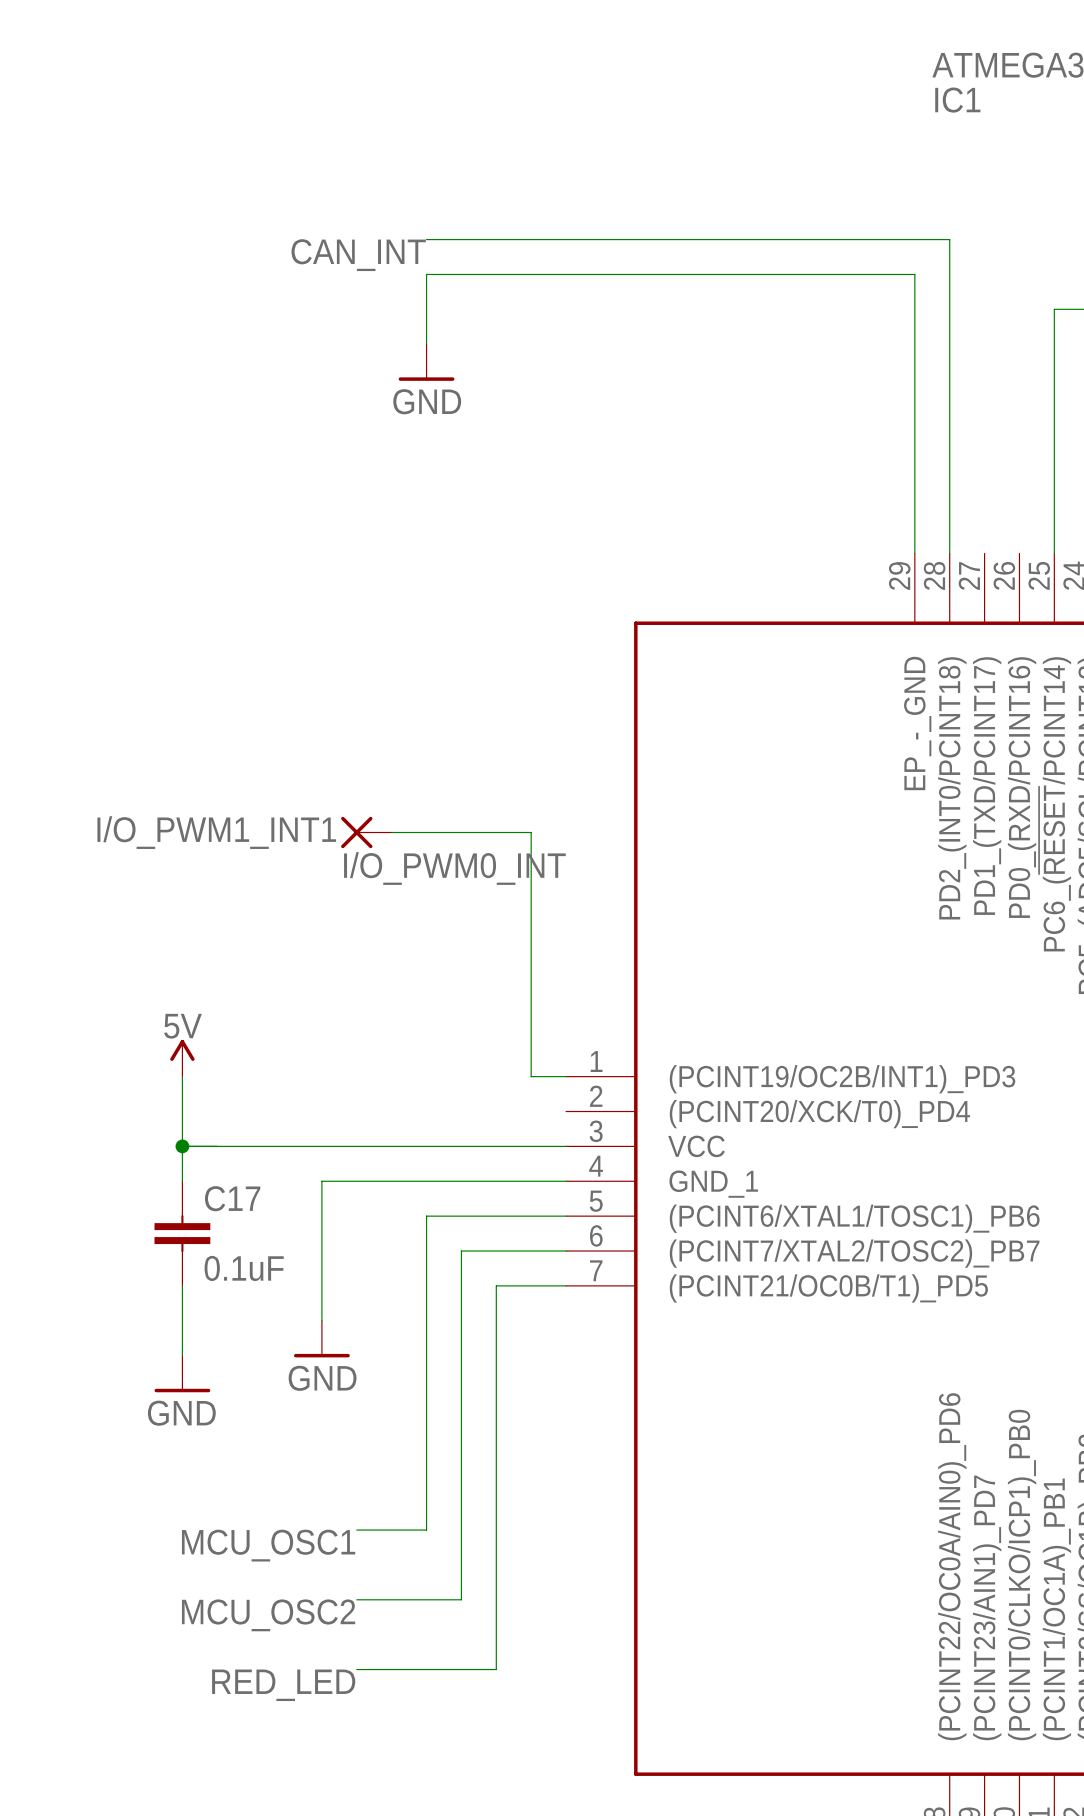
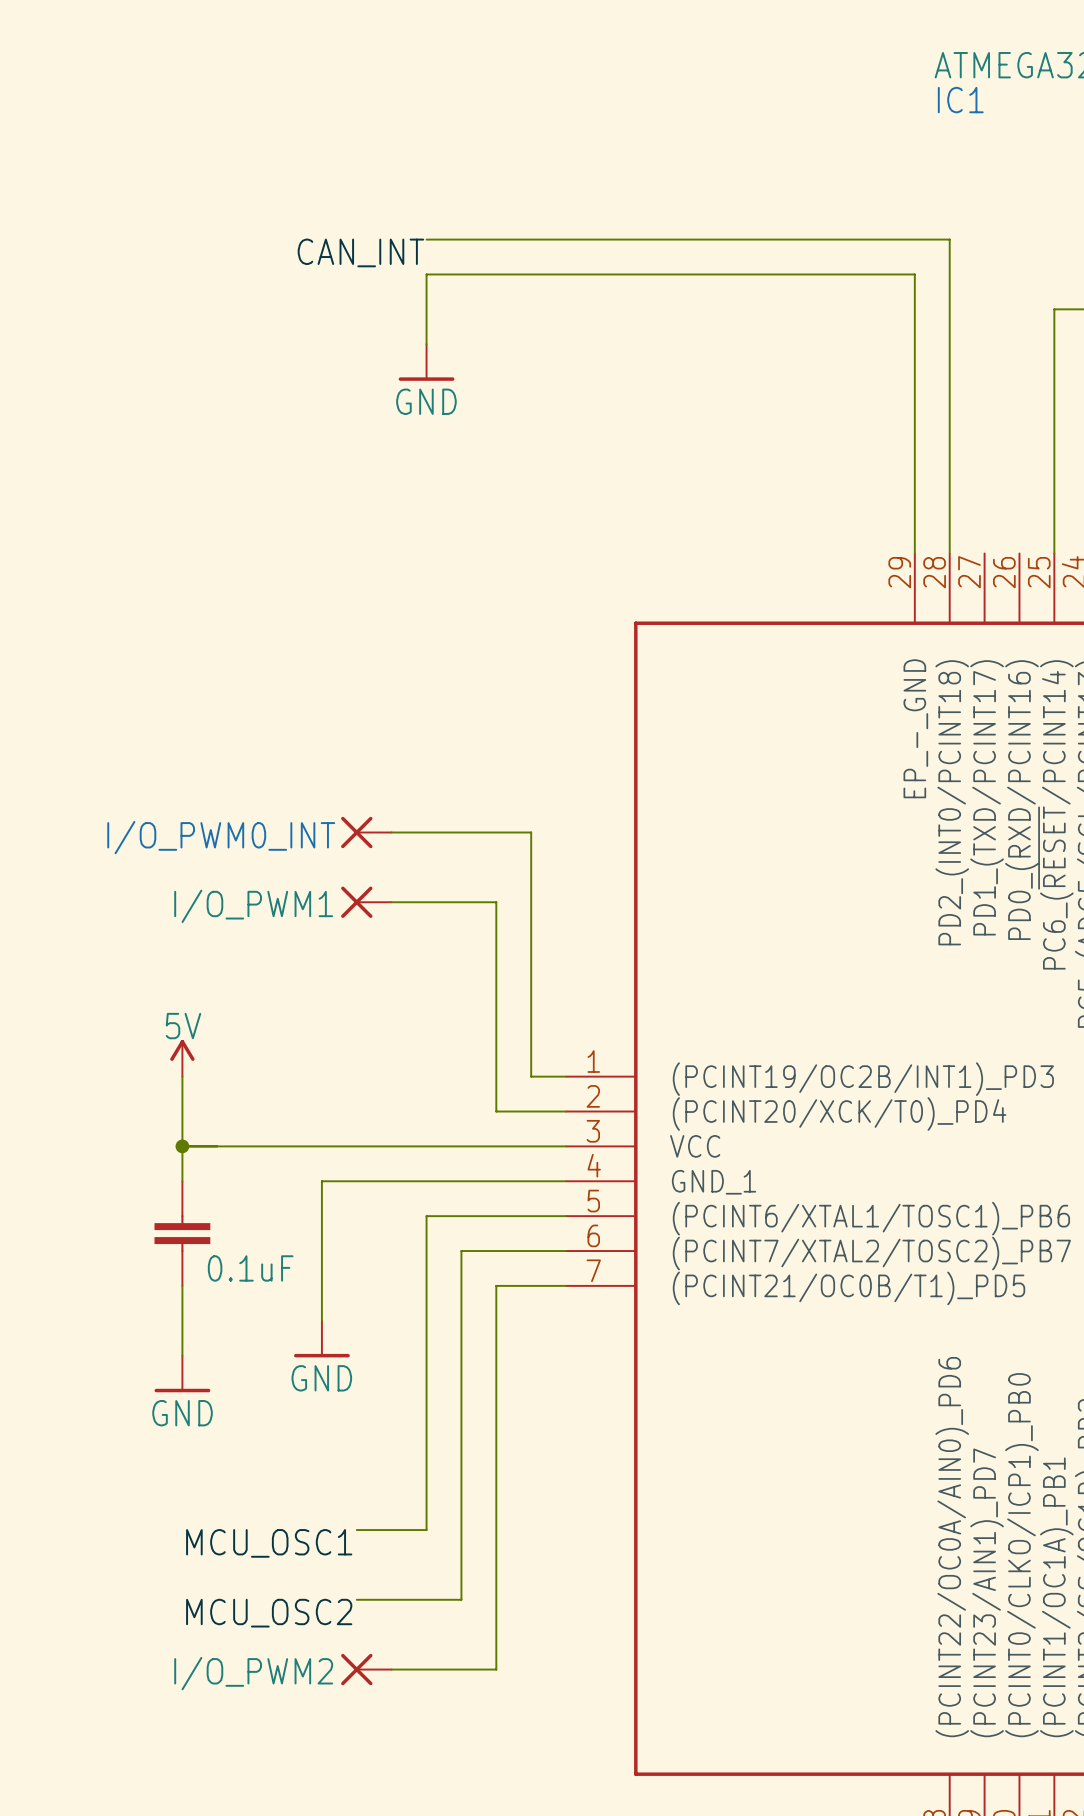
I/O_PWM1_INT1 name: I/O_PWM1_INT1 (216, 832) -> I/O_PWM0_INT (221, 837)
I/O_PWM1_INT1 value: I/O_PWM0_INT (454, 868) -> none
part: none -> I/O_PWM1 (366, 902)
wire: none -> (391, 902) (496, 902) (496, 1111) (566, 1111)
C17 name: C17 (232, 1198) -> none
part: none -> I/O_PWM2 (366, 1669)
label: RED_LED (283, 1685) -> none

